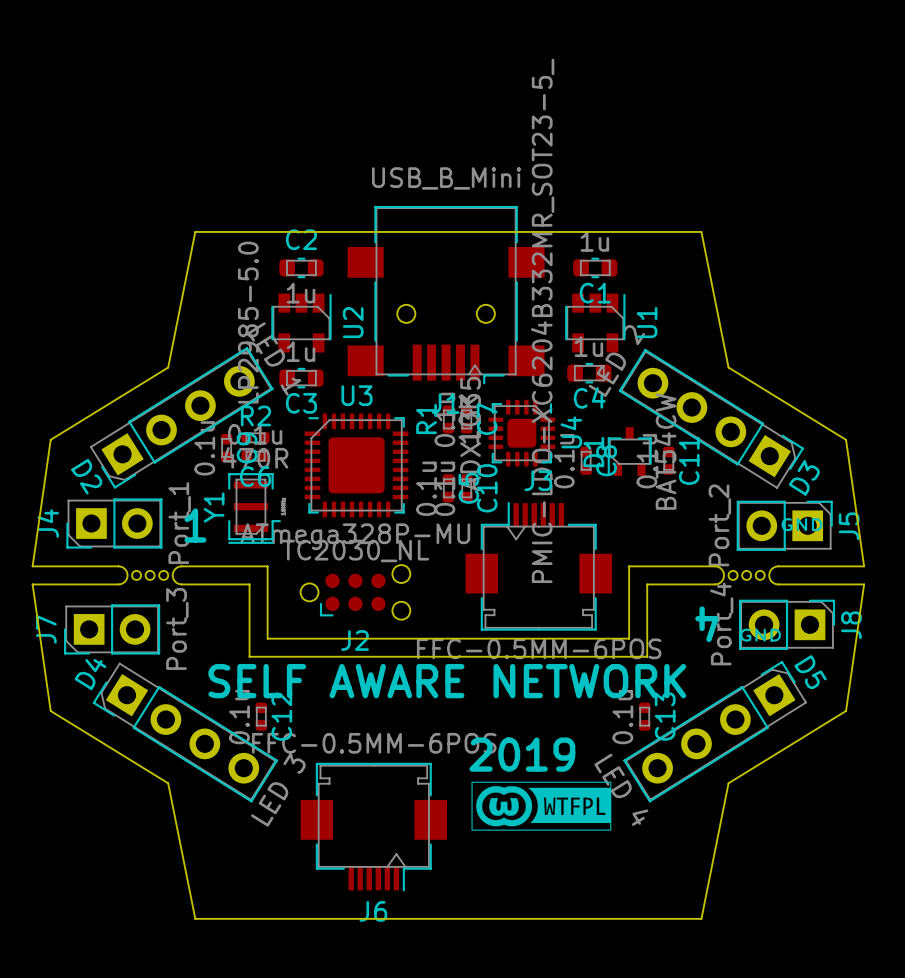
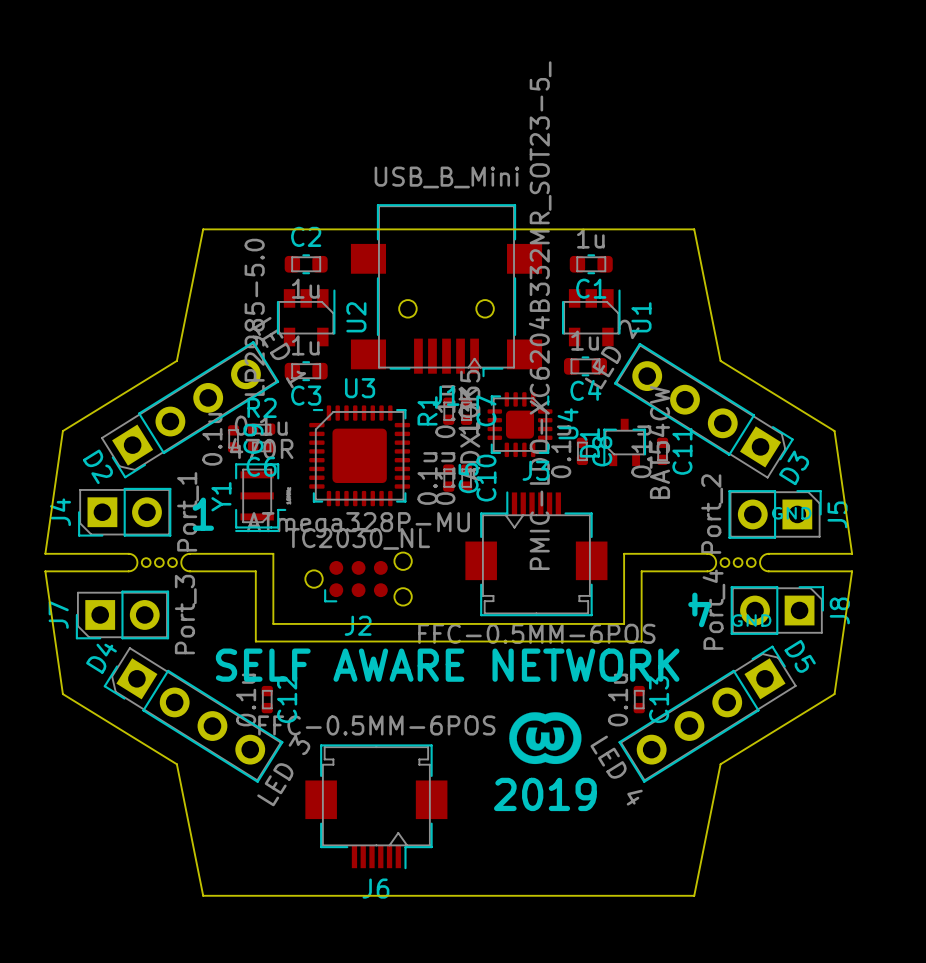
drawing: none -> [509, 712, 582, 765]
text position: 2019 (522, 754) -> 2019 (545, 794)
drawing: [471, 781, 612, 831] -> none

